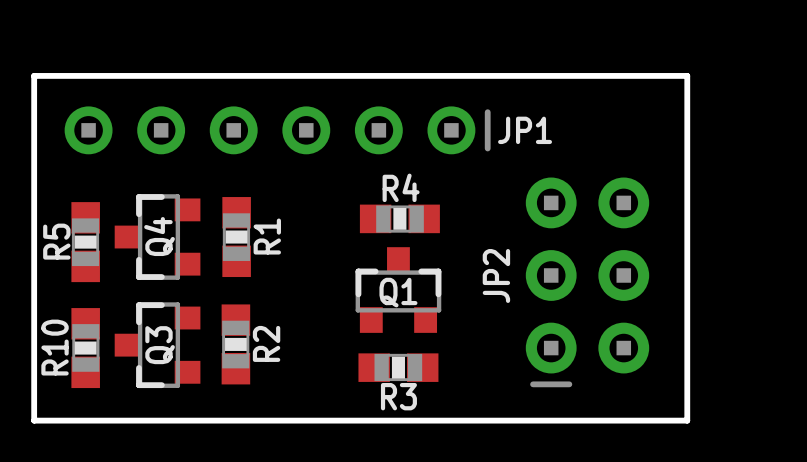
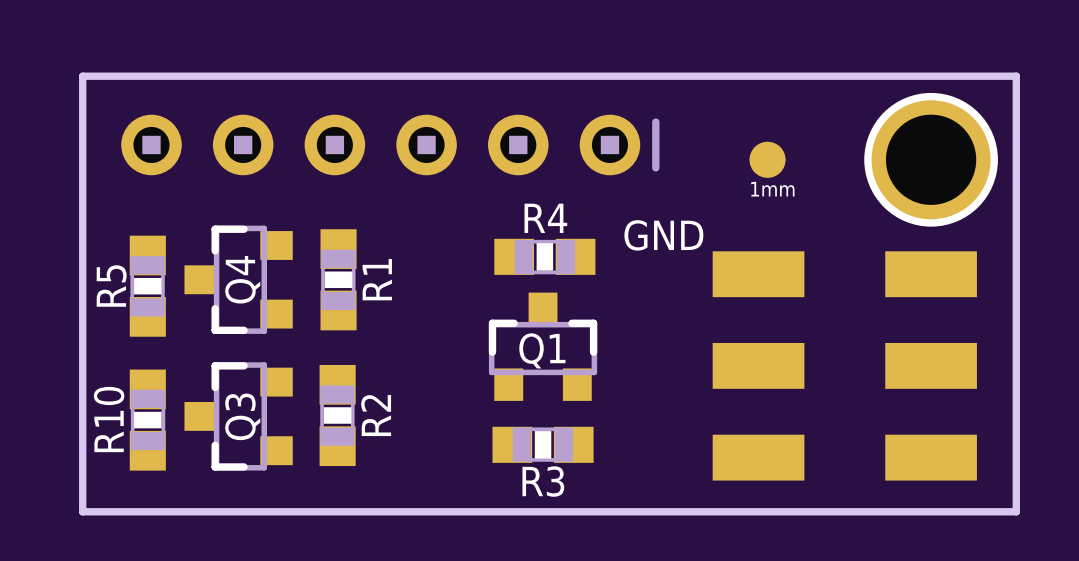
board edge: (687, 75) (687, 420) -> (907, 76) (1016, 76) (1016, 511) (907, 511)
JP1 name: JP1 (525, 130) -> none
part: none -> (767, 159)
part: none -> (931, 159)
text: none -> GND (663, 235)
part: none -> (758, 274)
part: none -> (931, 274)
JP2: (587, 282) -> none
part: none -> (758, 365)
part: none -> (931, 365)
part: none -> (758, 457)
part: none -> (931, 457)

